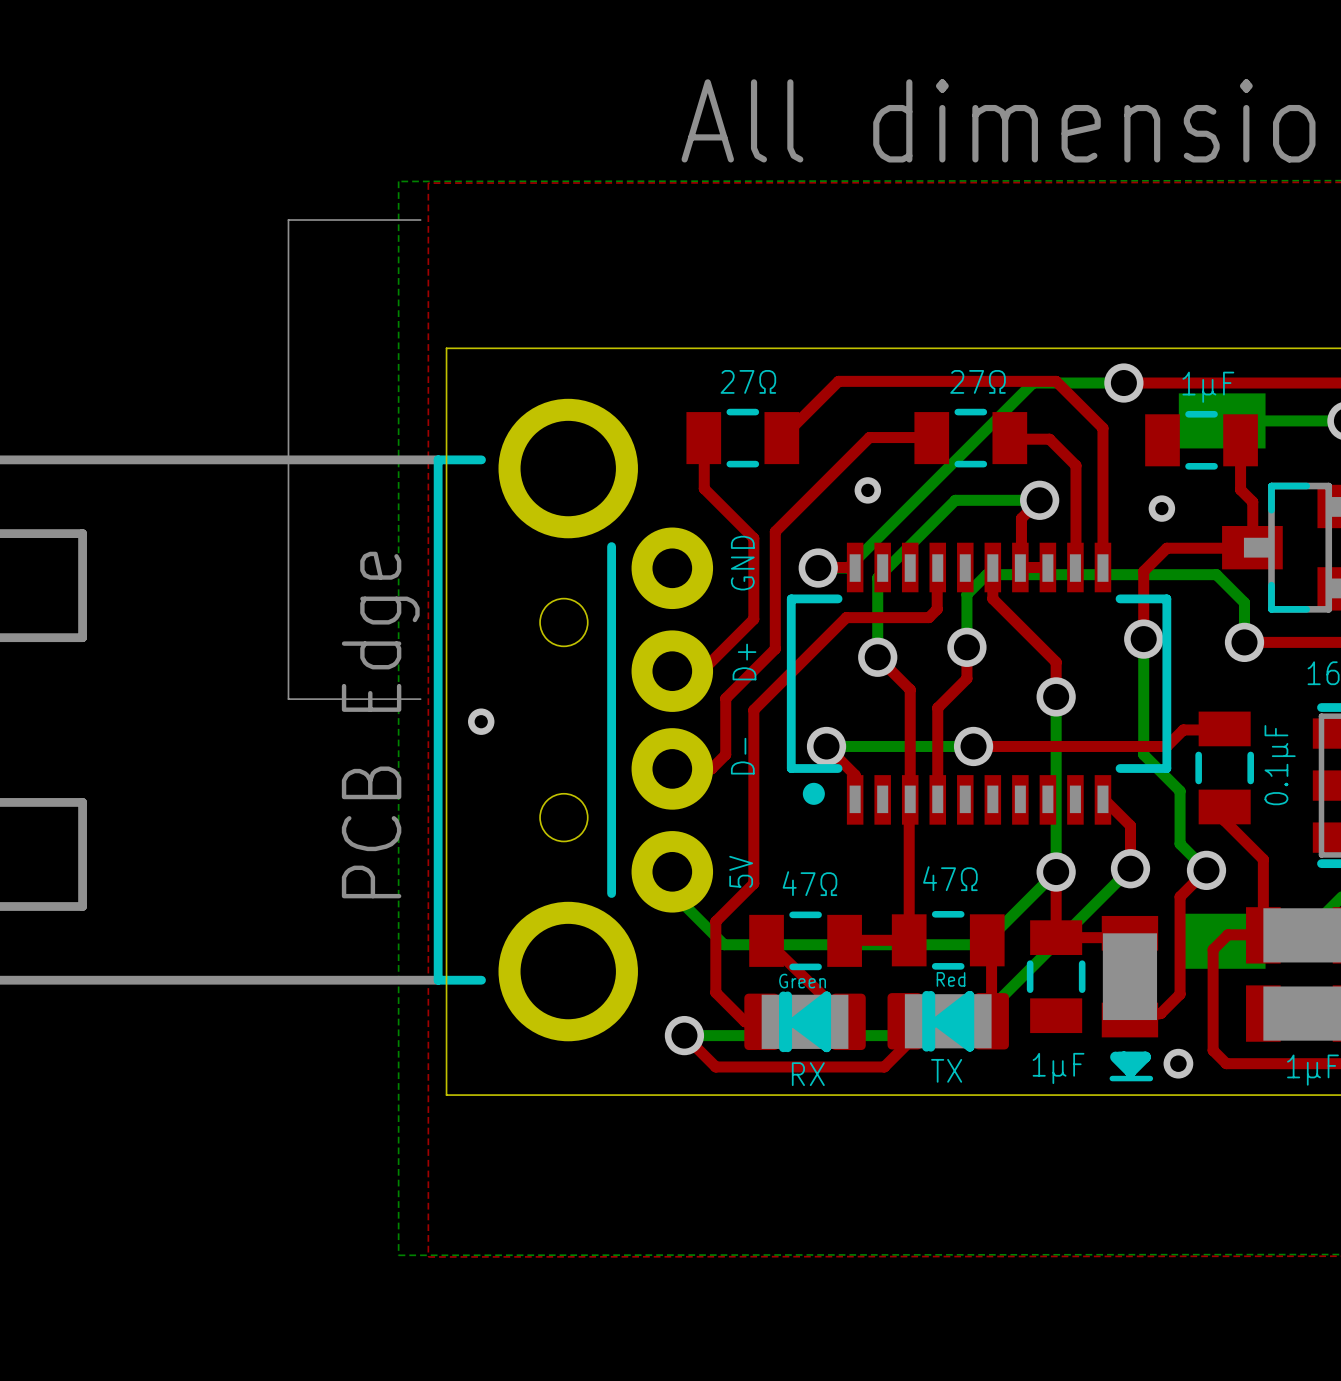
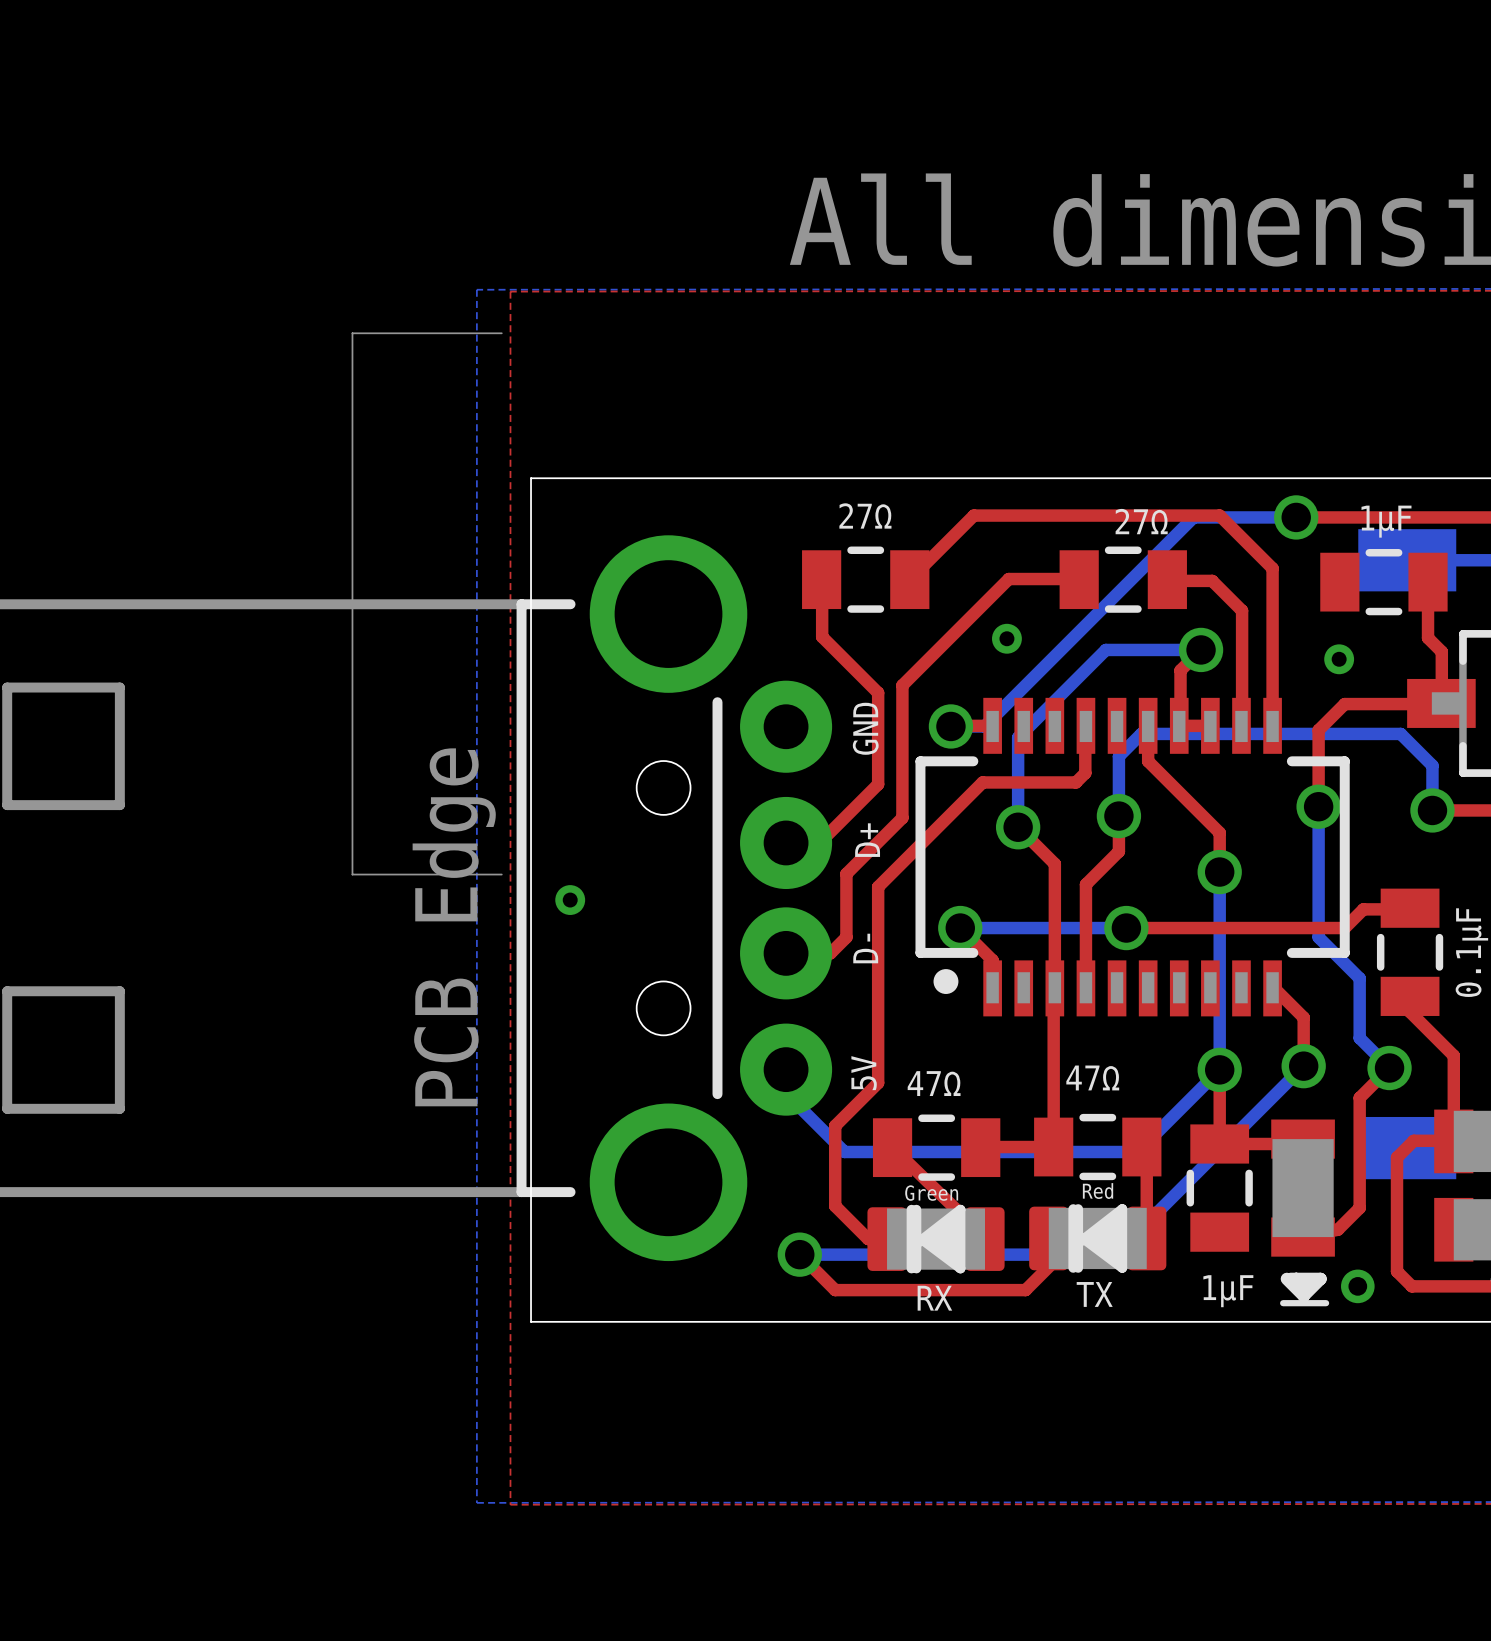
text position: 27Ω (978, 381) -> 27Ω (1141, 521)

